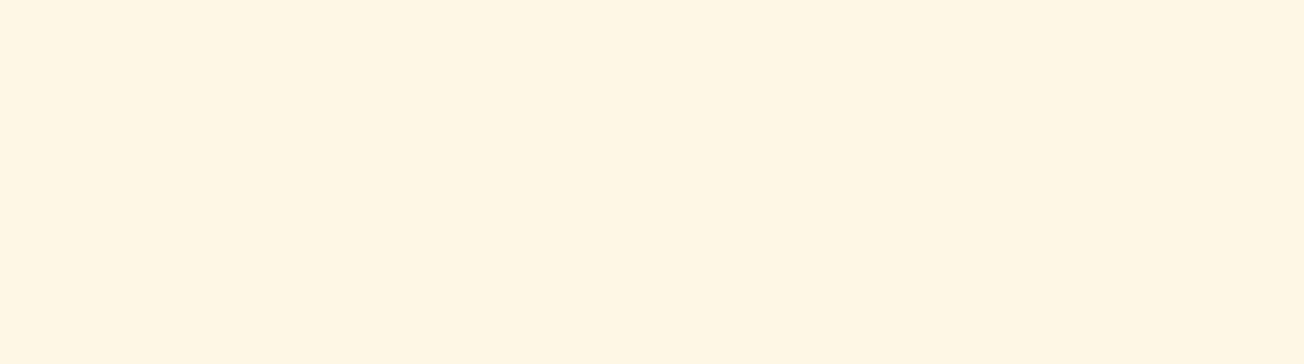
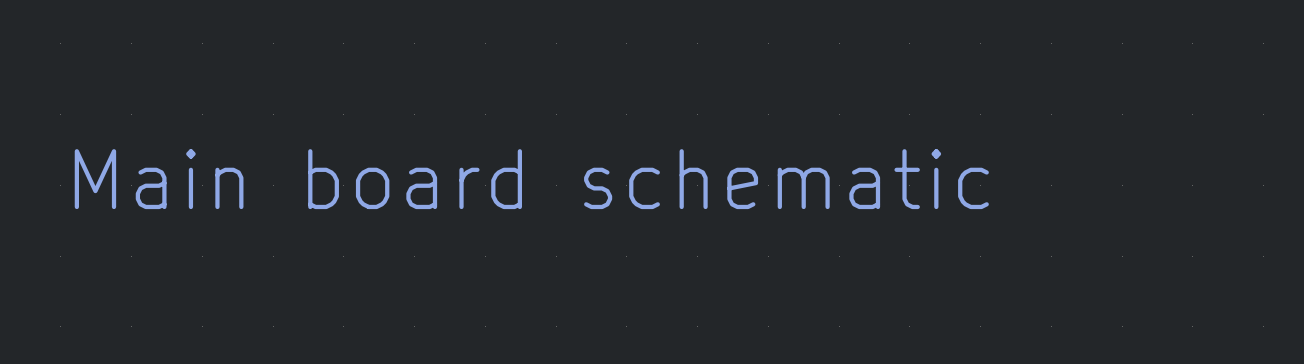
text: none -> Main board schematic (531, 179)

